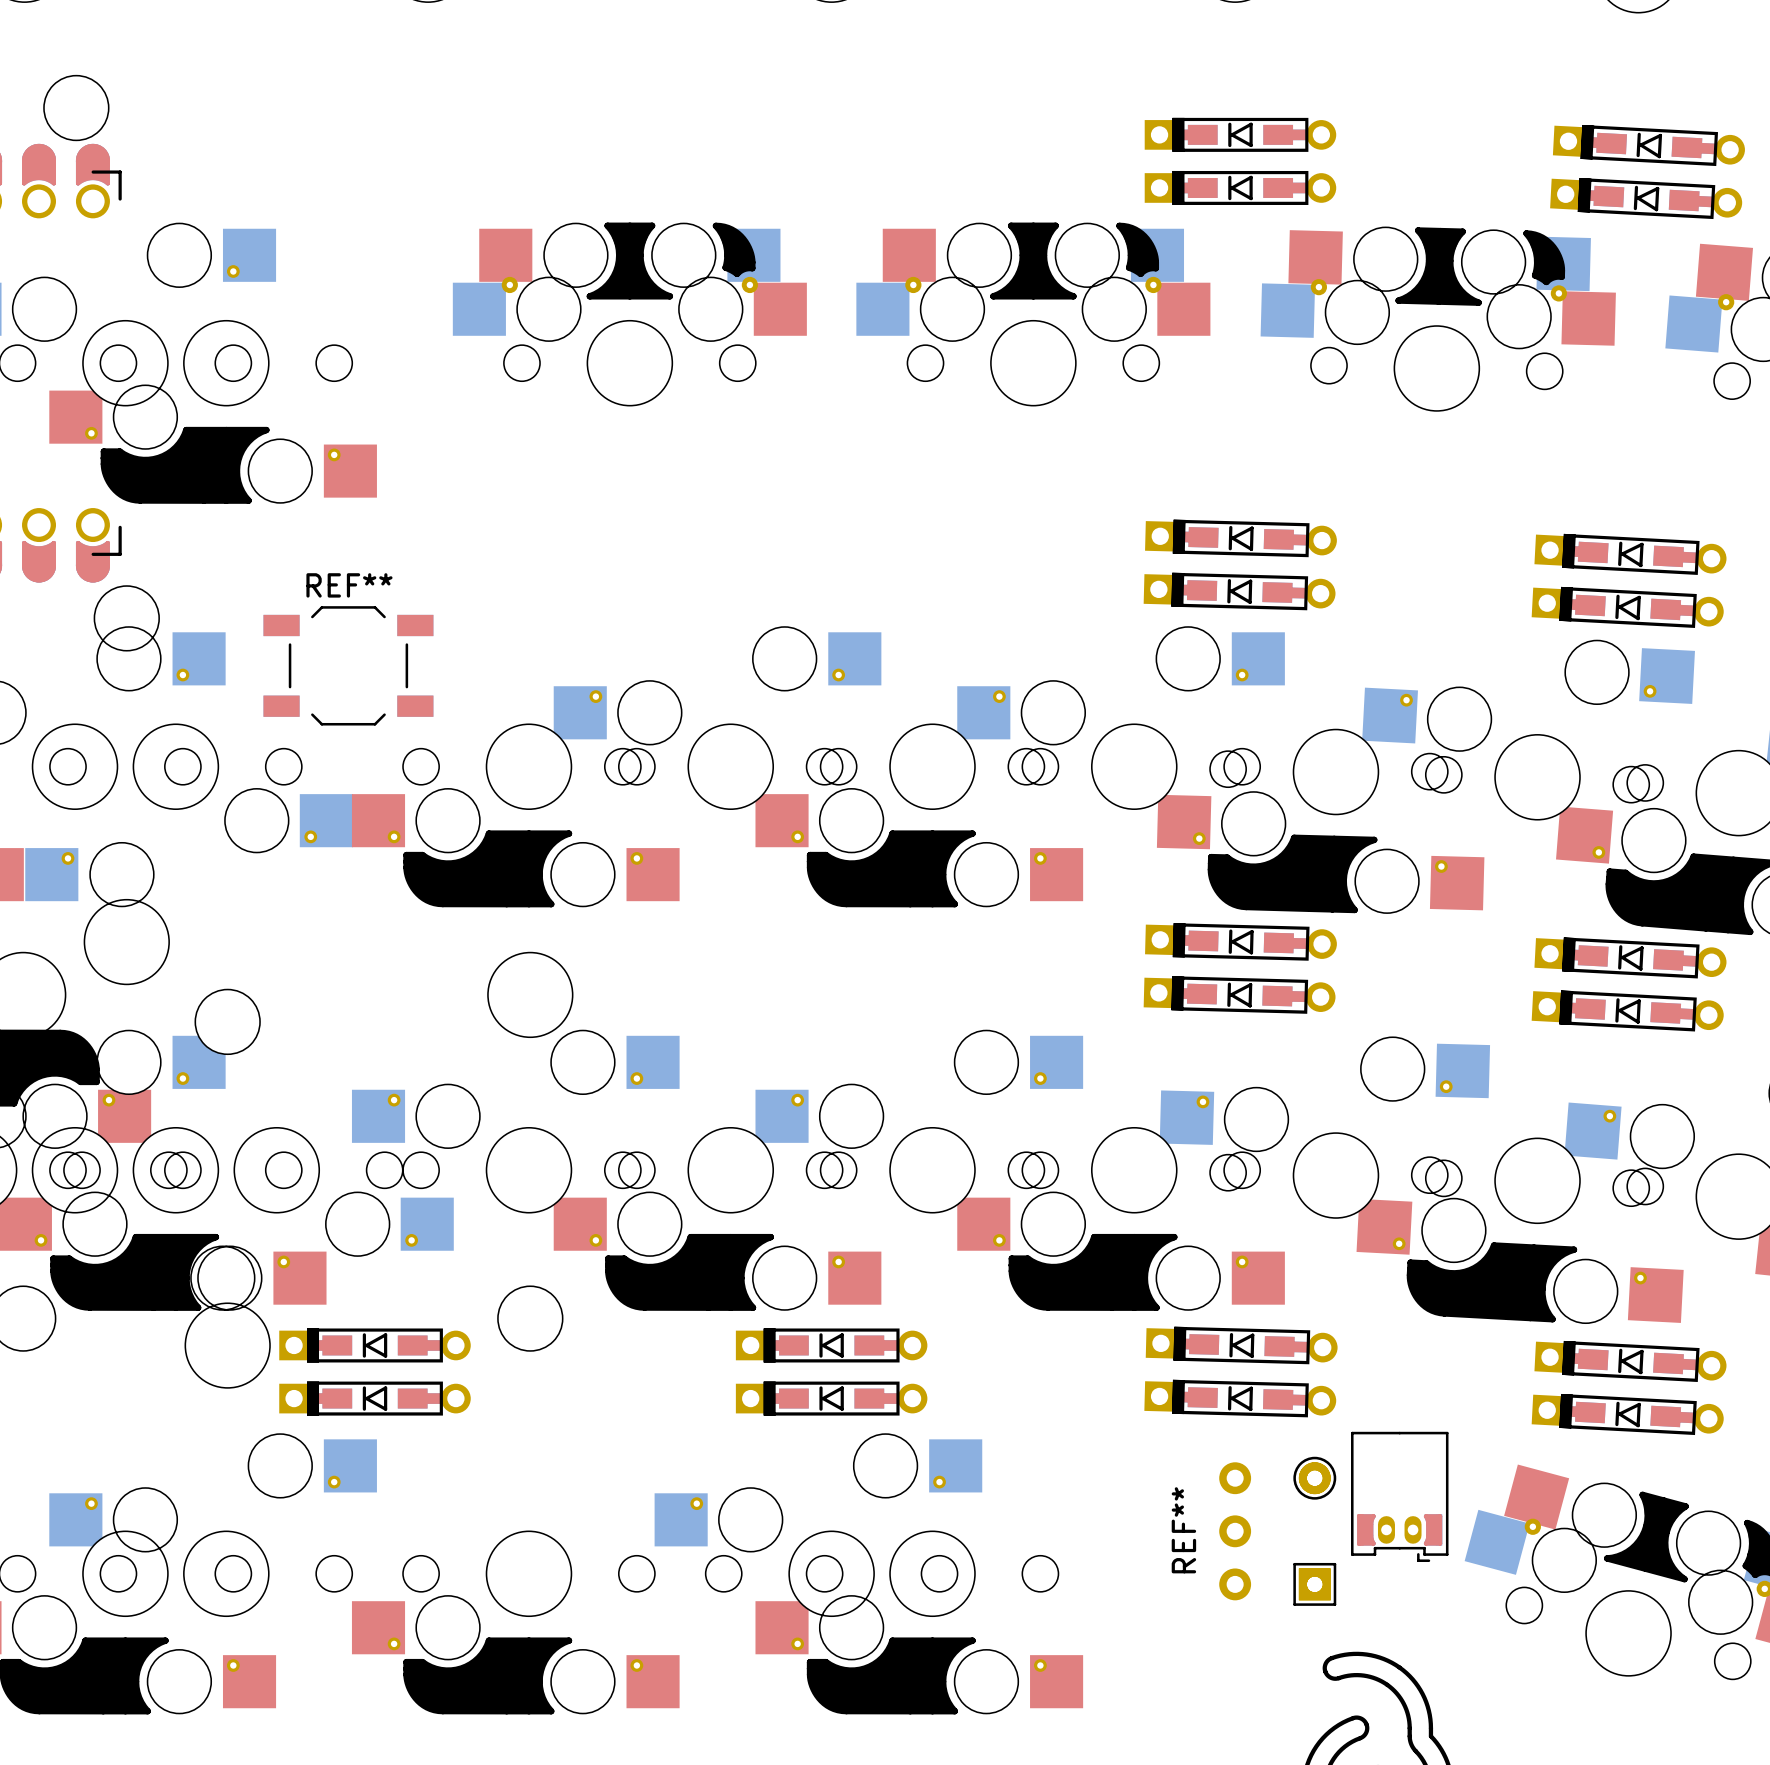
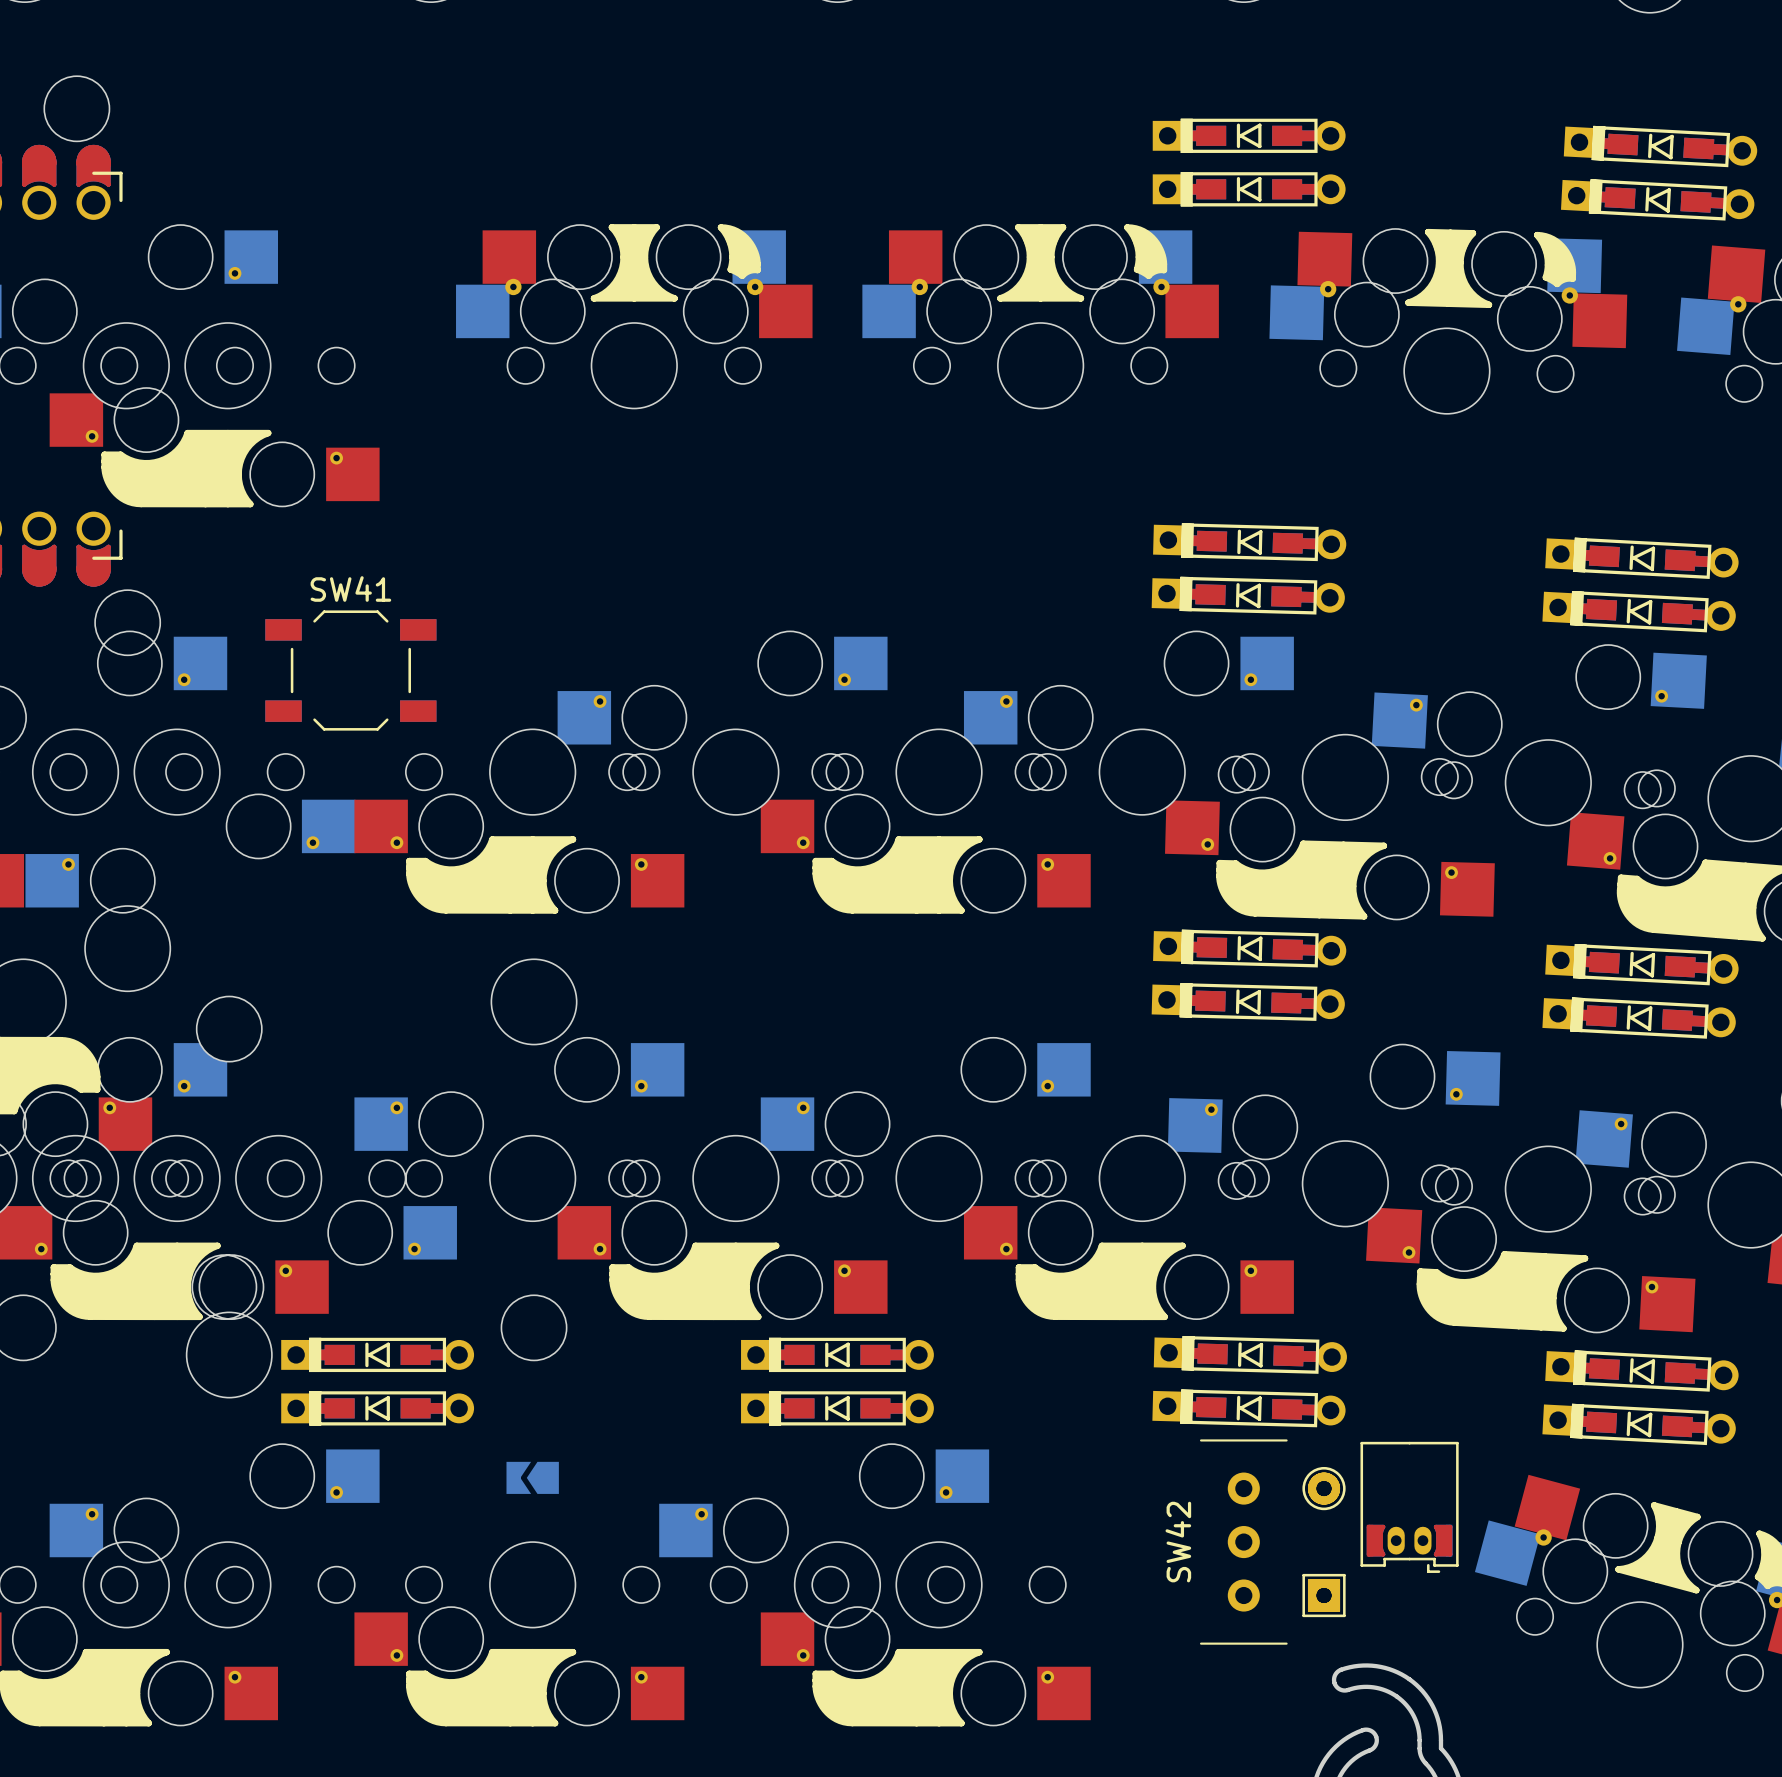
REF** name: REF** (349, 585) -> SW41 (350, 589)
part footprint: [1219, 1462, 1252, 1601] -> [1199, 1439, 1288, 1645]
part: none -> (532, 1477)

